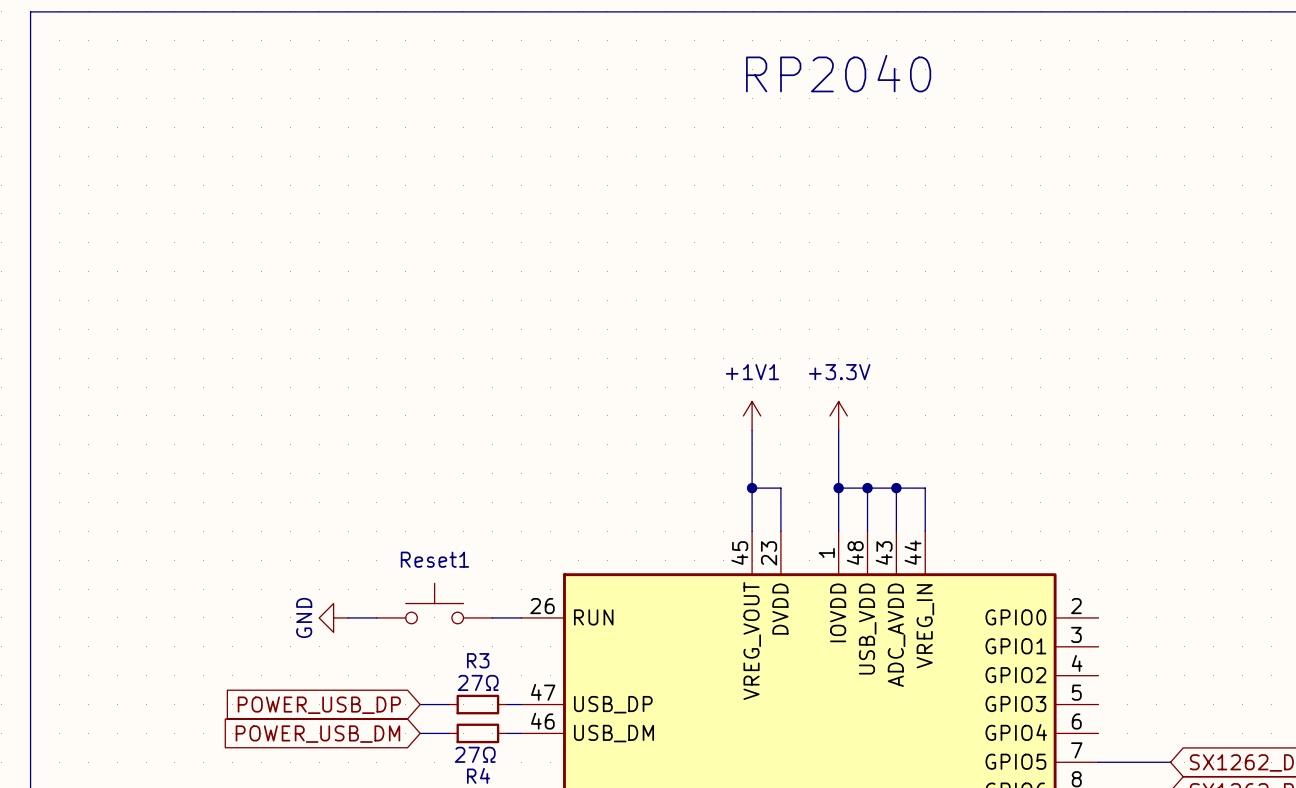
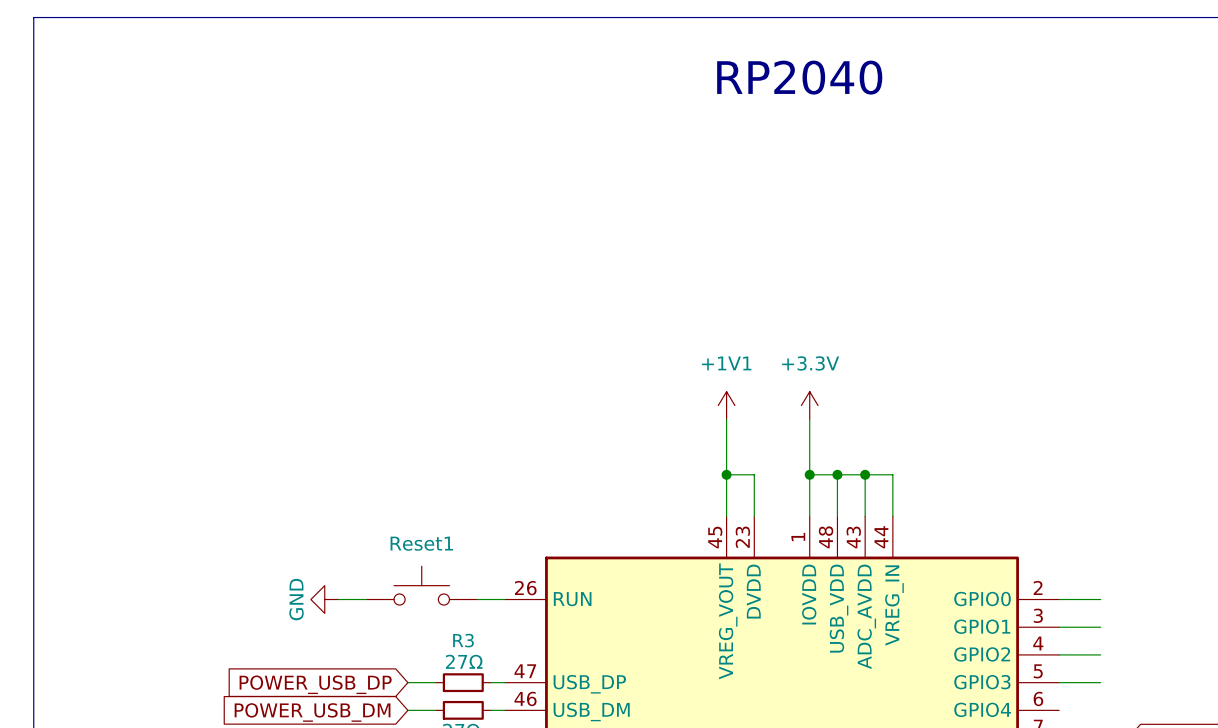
wire: none -> (1059, 599) (1100, 599)
wire: none -> (1059, 627) (1100, 627)
wire: none -> (1059, 654) (1100, 654)
wire: none -> (1059, 682) (1100, 682)

